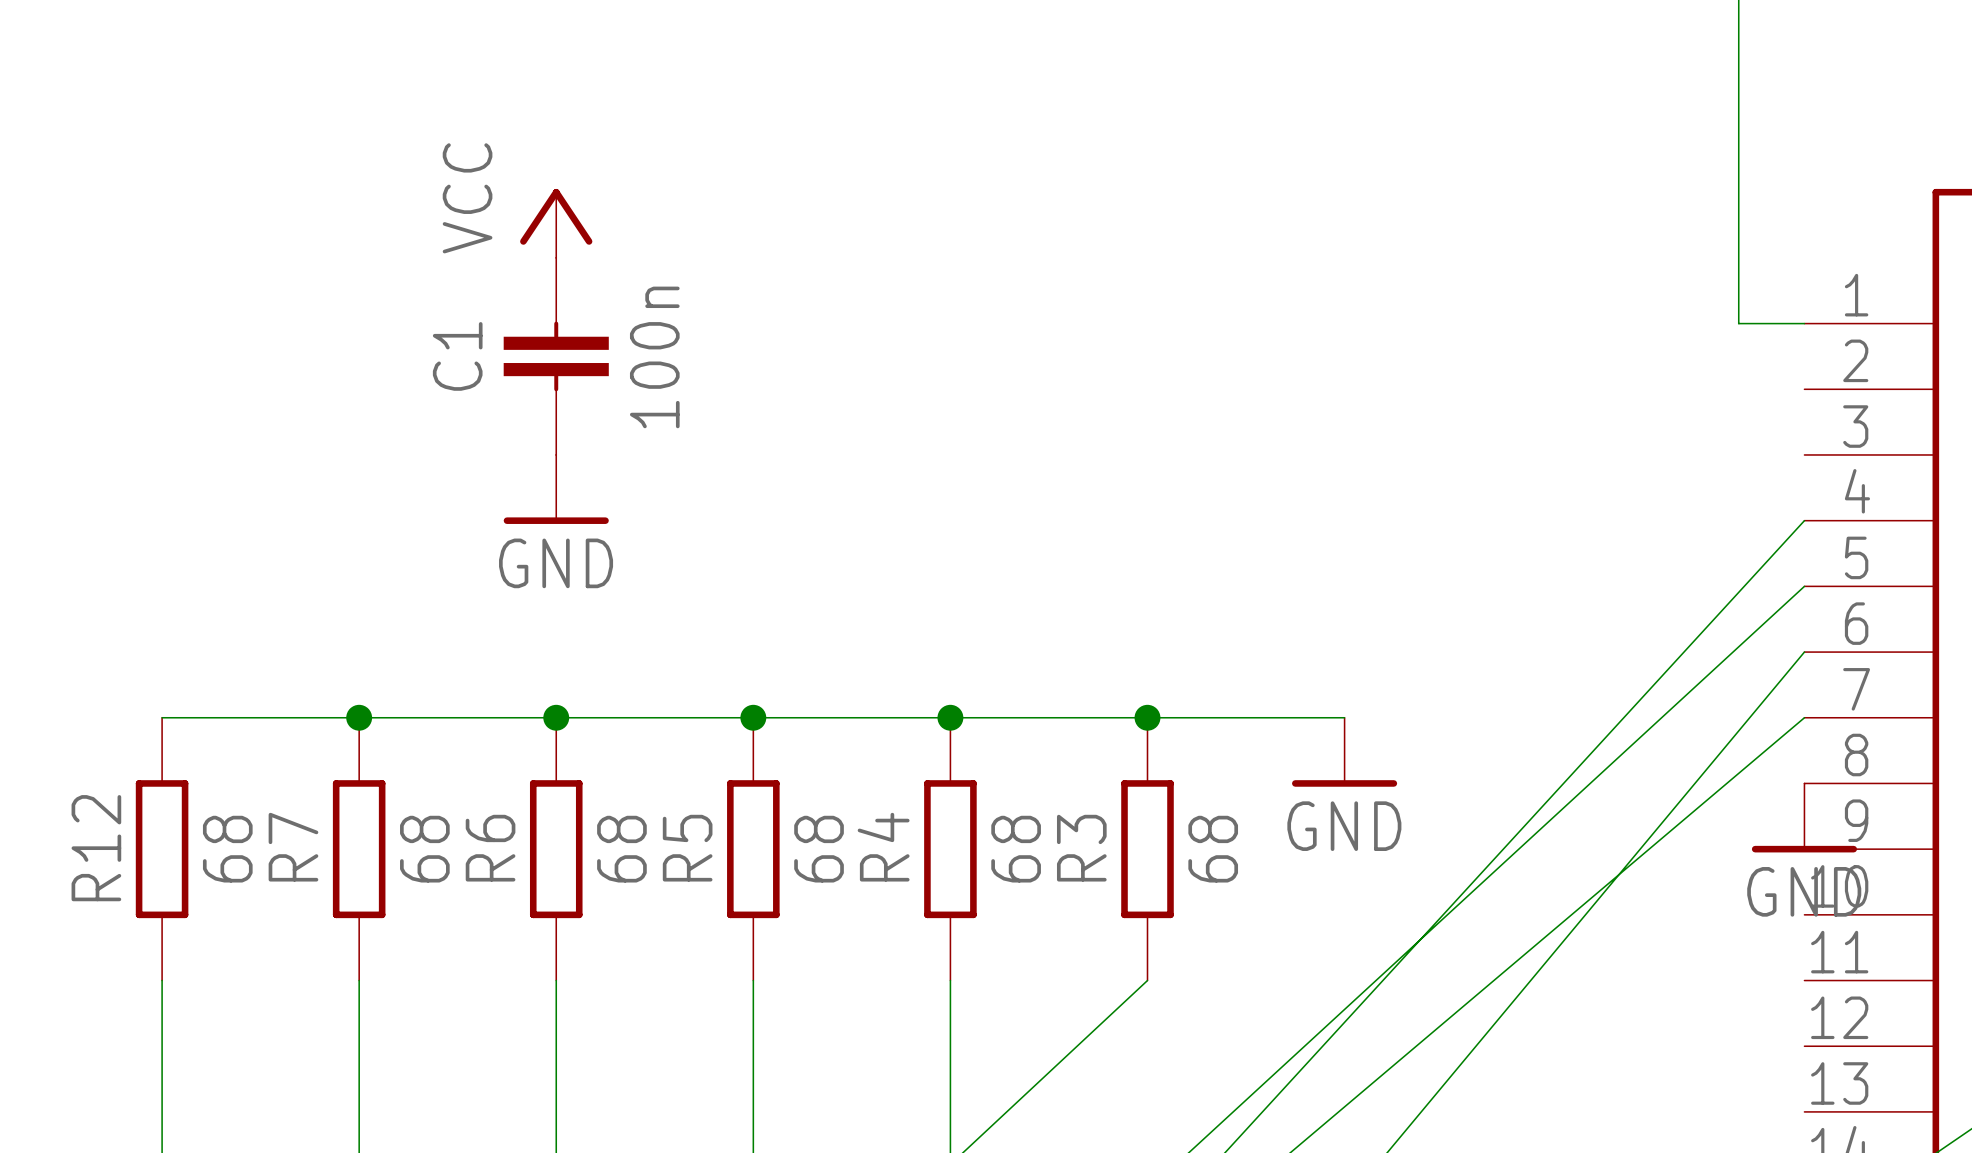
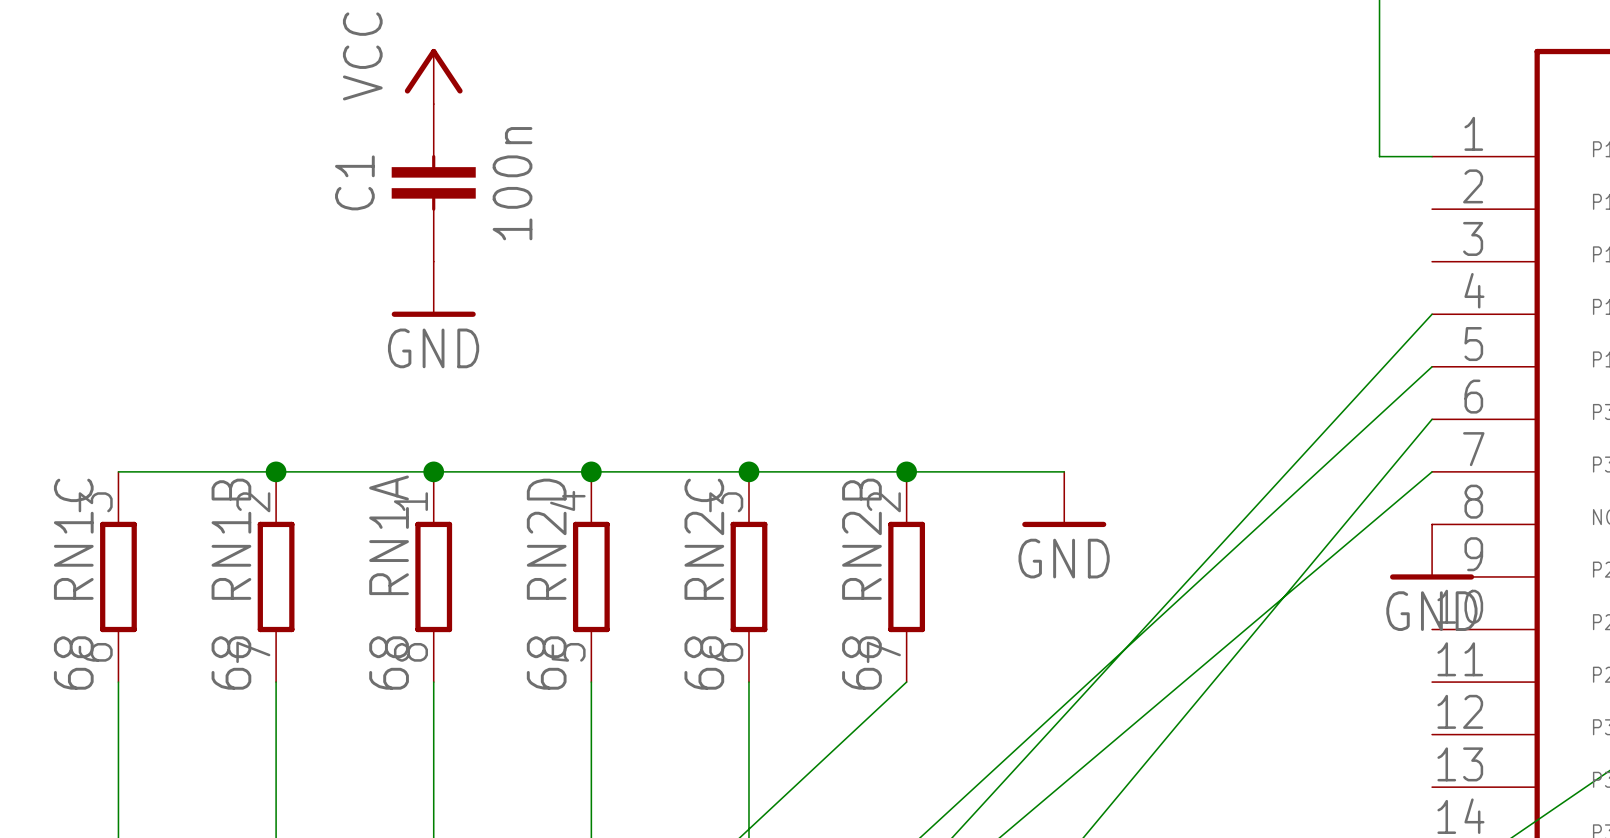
R12: 68 (162, 849) -> none
RN1C: none -> 68 (118, 576)
R7: 68 (359, 849) -> none
RN1B: none -> 68 (276, 576)
R6: 68 (556, 849) -> none
RN1A: none -> 68 (433, 576)
R5: 68 (753, 849) -> none
RN2D: none -> 68 (591, 576)
R4: 68 (950, 849) -> none
RN2C: none -> 68 (748, 576)
R3: 68 (1147, 849) -> none
RN2B: none -> 68 (906, 576)

